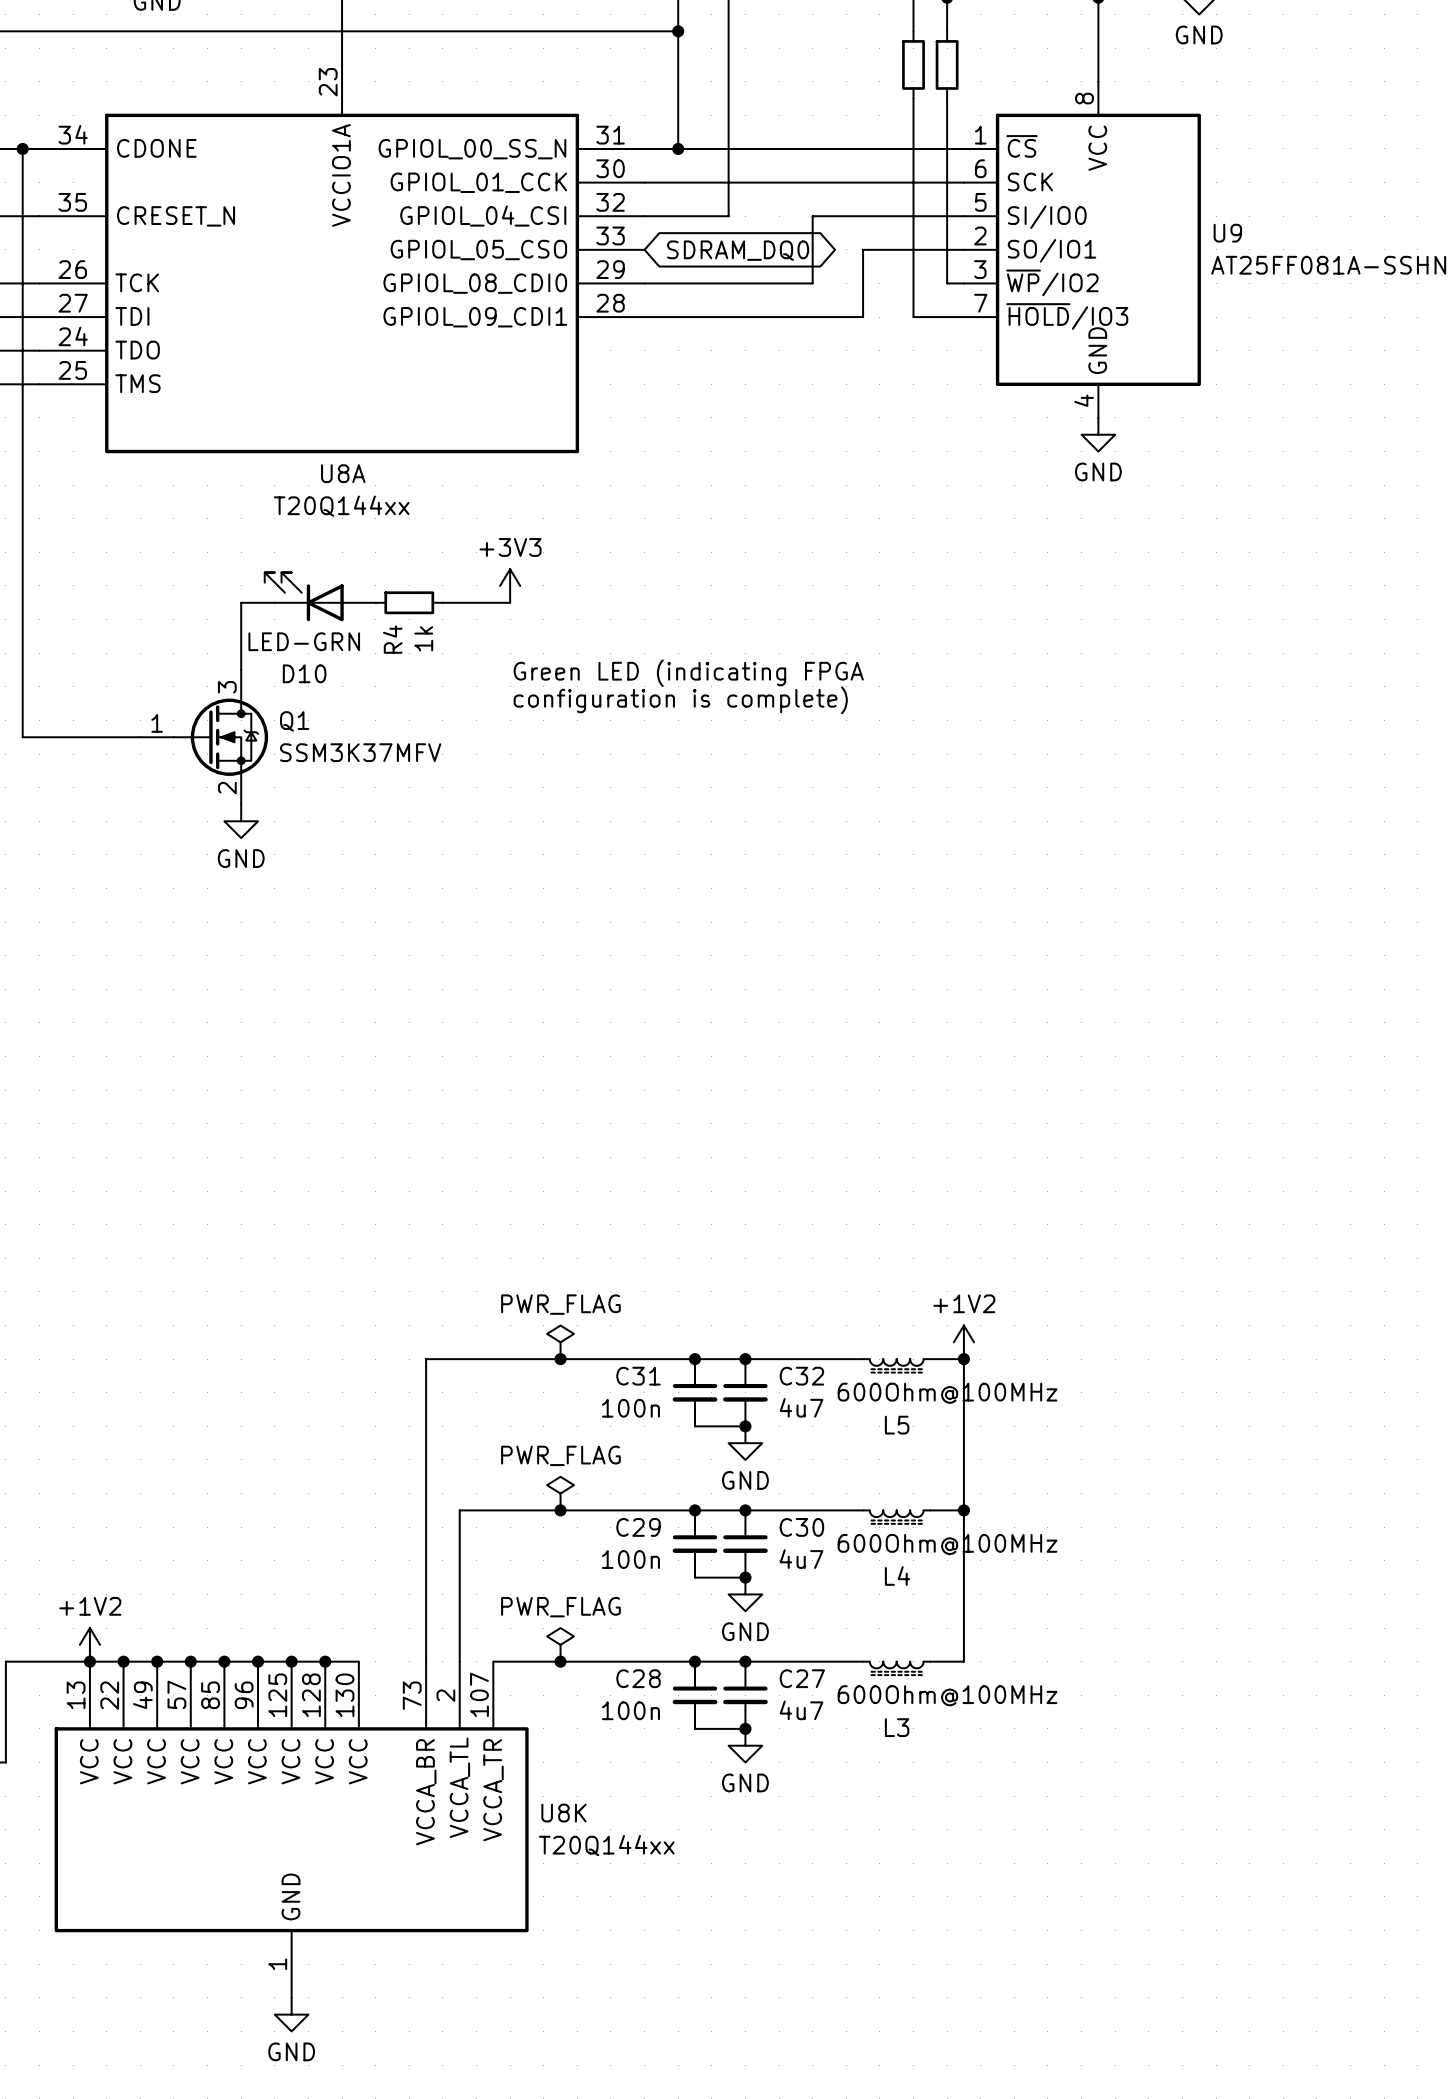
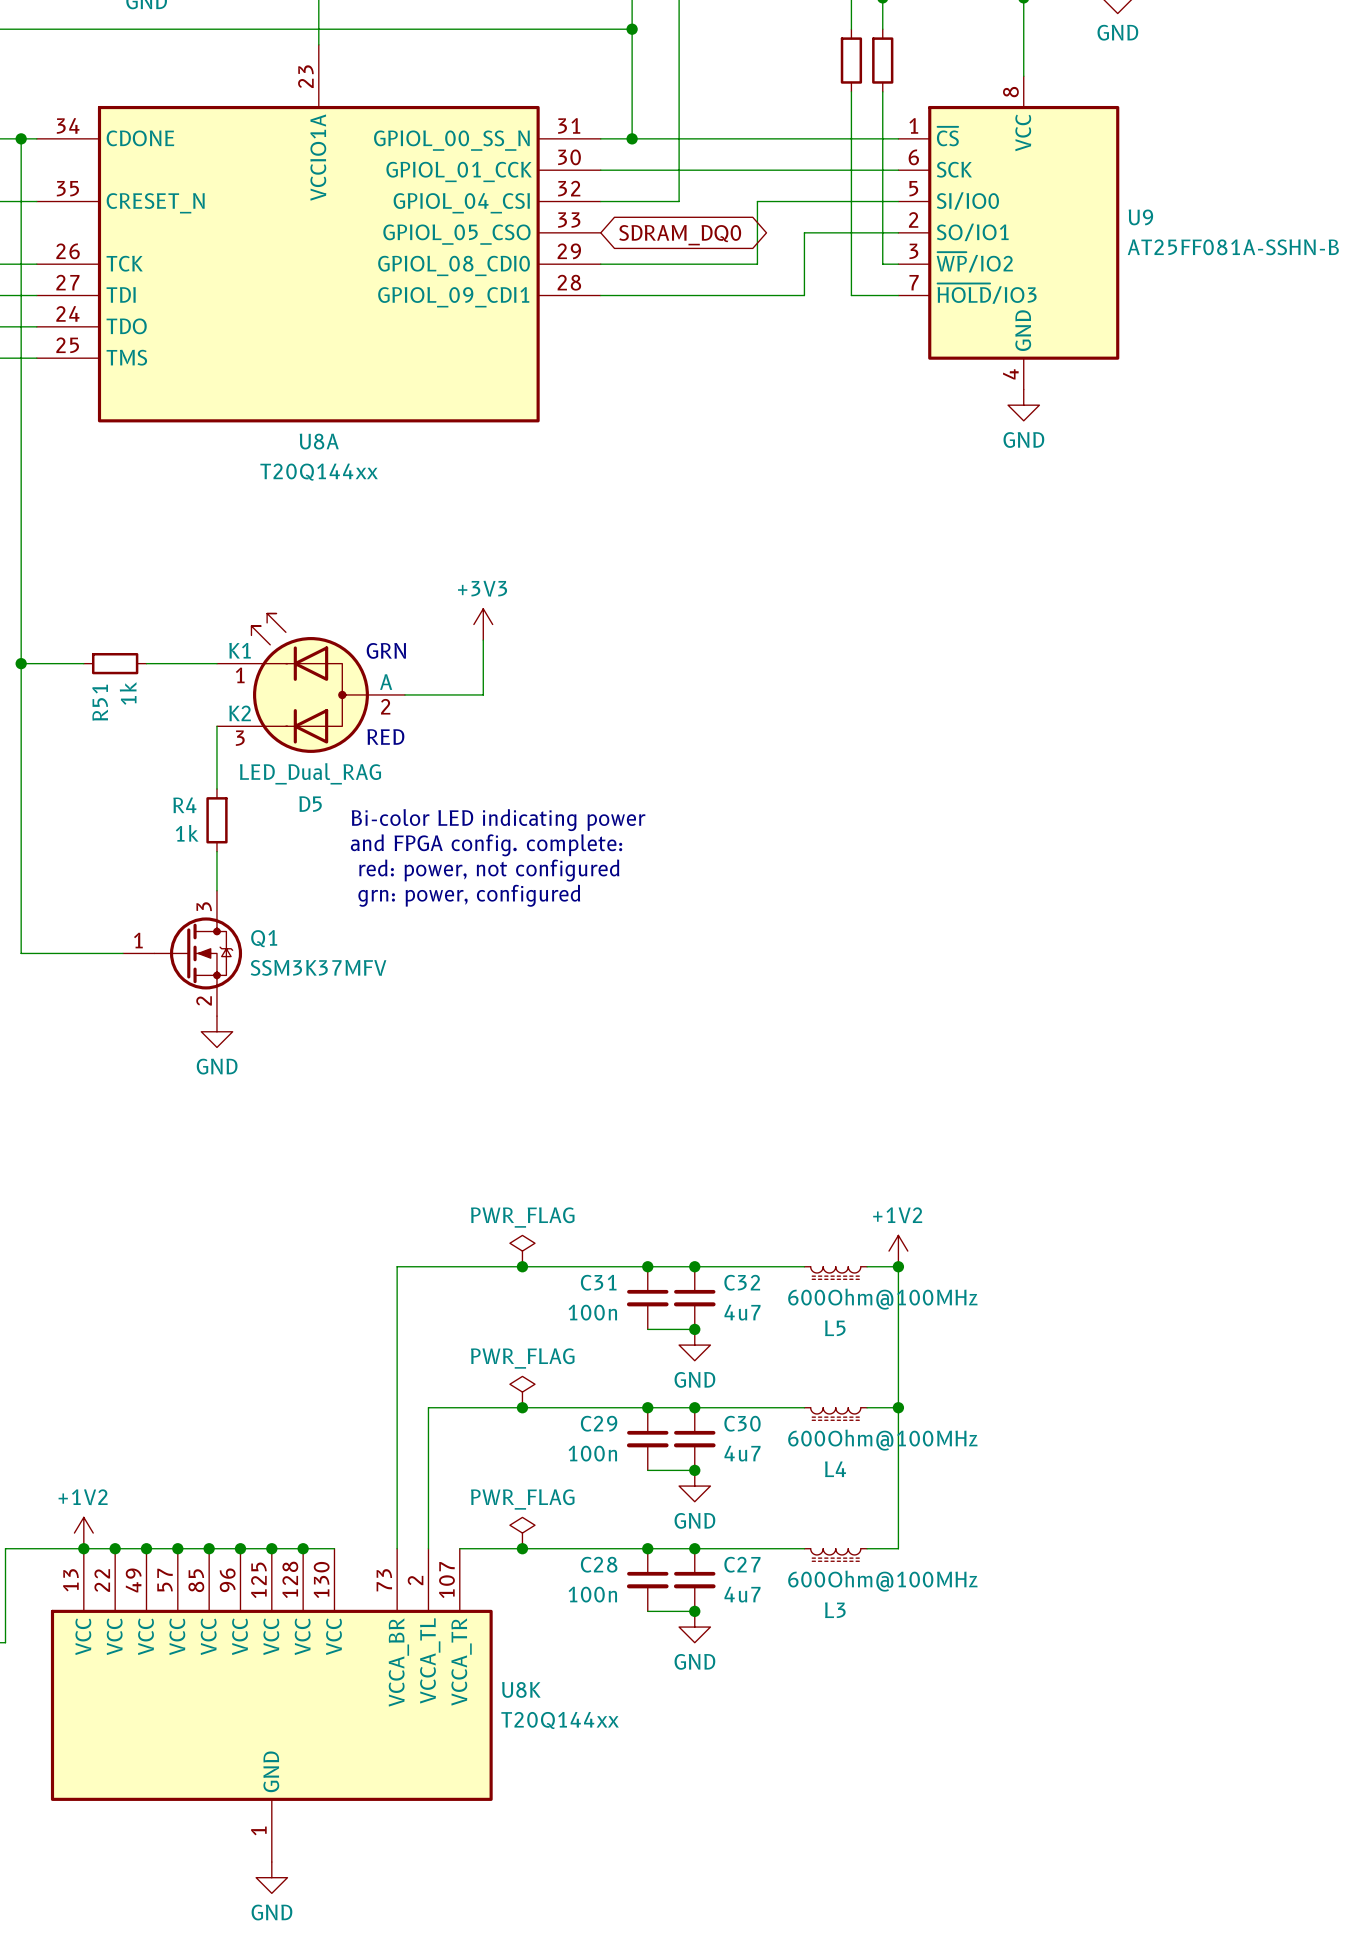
power symbol position: +3V3 (510, 585) -> +3V3 (483, 624)
D10: LED-GRN (320, 596) -> none
wire: (274, 602) (241, 602) (241, 670) -> none
R4 rotation: 0° (409, 602) -> 90° clockwise (216, 820)
R4 position: (409, 602) -> (216, 820)
wire: (442, 602) (510, 602) -> none
text: Green LED (indicating FPGA (688, 673) -> none
wire: none -> (483, 640) (483, 694) (404, 694)
text: none -> GRN (386, 650)
text: configuration is complete) (680, 700) -> none
wire: none -> (21, 663) (83, 663)
junction: none -> (21, 663)
R51: none -> 1k (115, 663)
wire: none -> (146, 663) (216, 663)
D5: none -> LED_Dual_RAG (310, 683)
wire: (22, 737) (140, 737) -> (21, 687) (21, 953) (122, 953)
Q1 position: (204, 737) -> (182, 953)
wire: none -> (216, 726) (216, 788)
text: none -> RED (385, 737)
power symbol position: GND (241, 821) -> GND (216, 1031)
text: none -> Bi-color LED indicating power (498, 820)
text: none -> and FPGA config. complete: (486, 845)
wire: none -> (216, 851) (216, 890)
text: none -> red: power, not configured (489, 870)
text: none -> grn: power, configured (469, 895)

